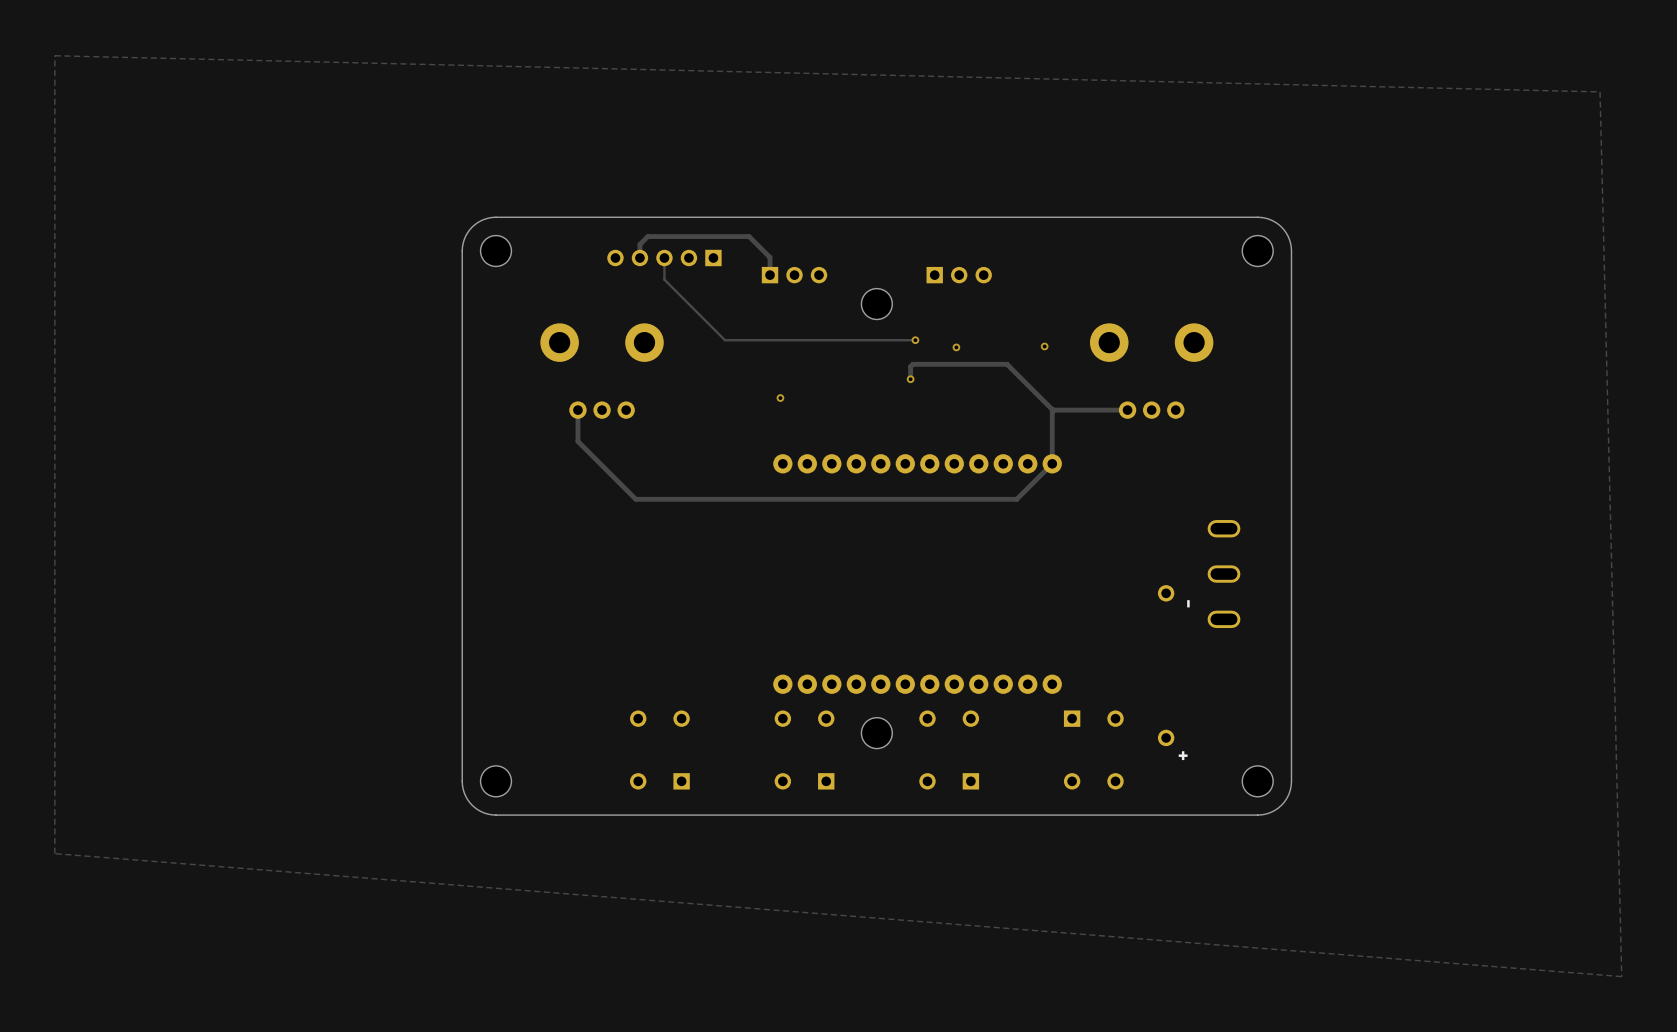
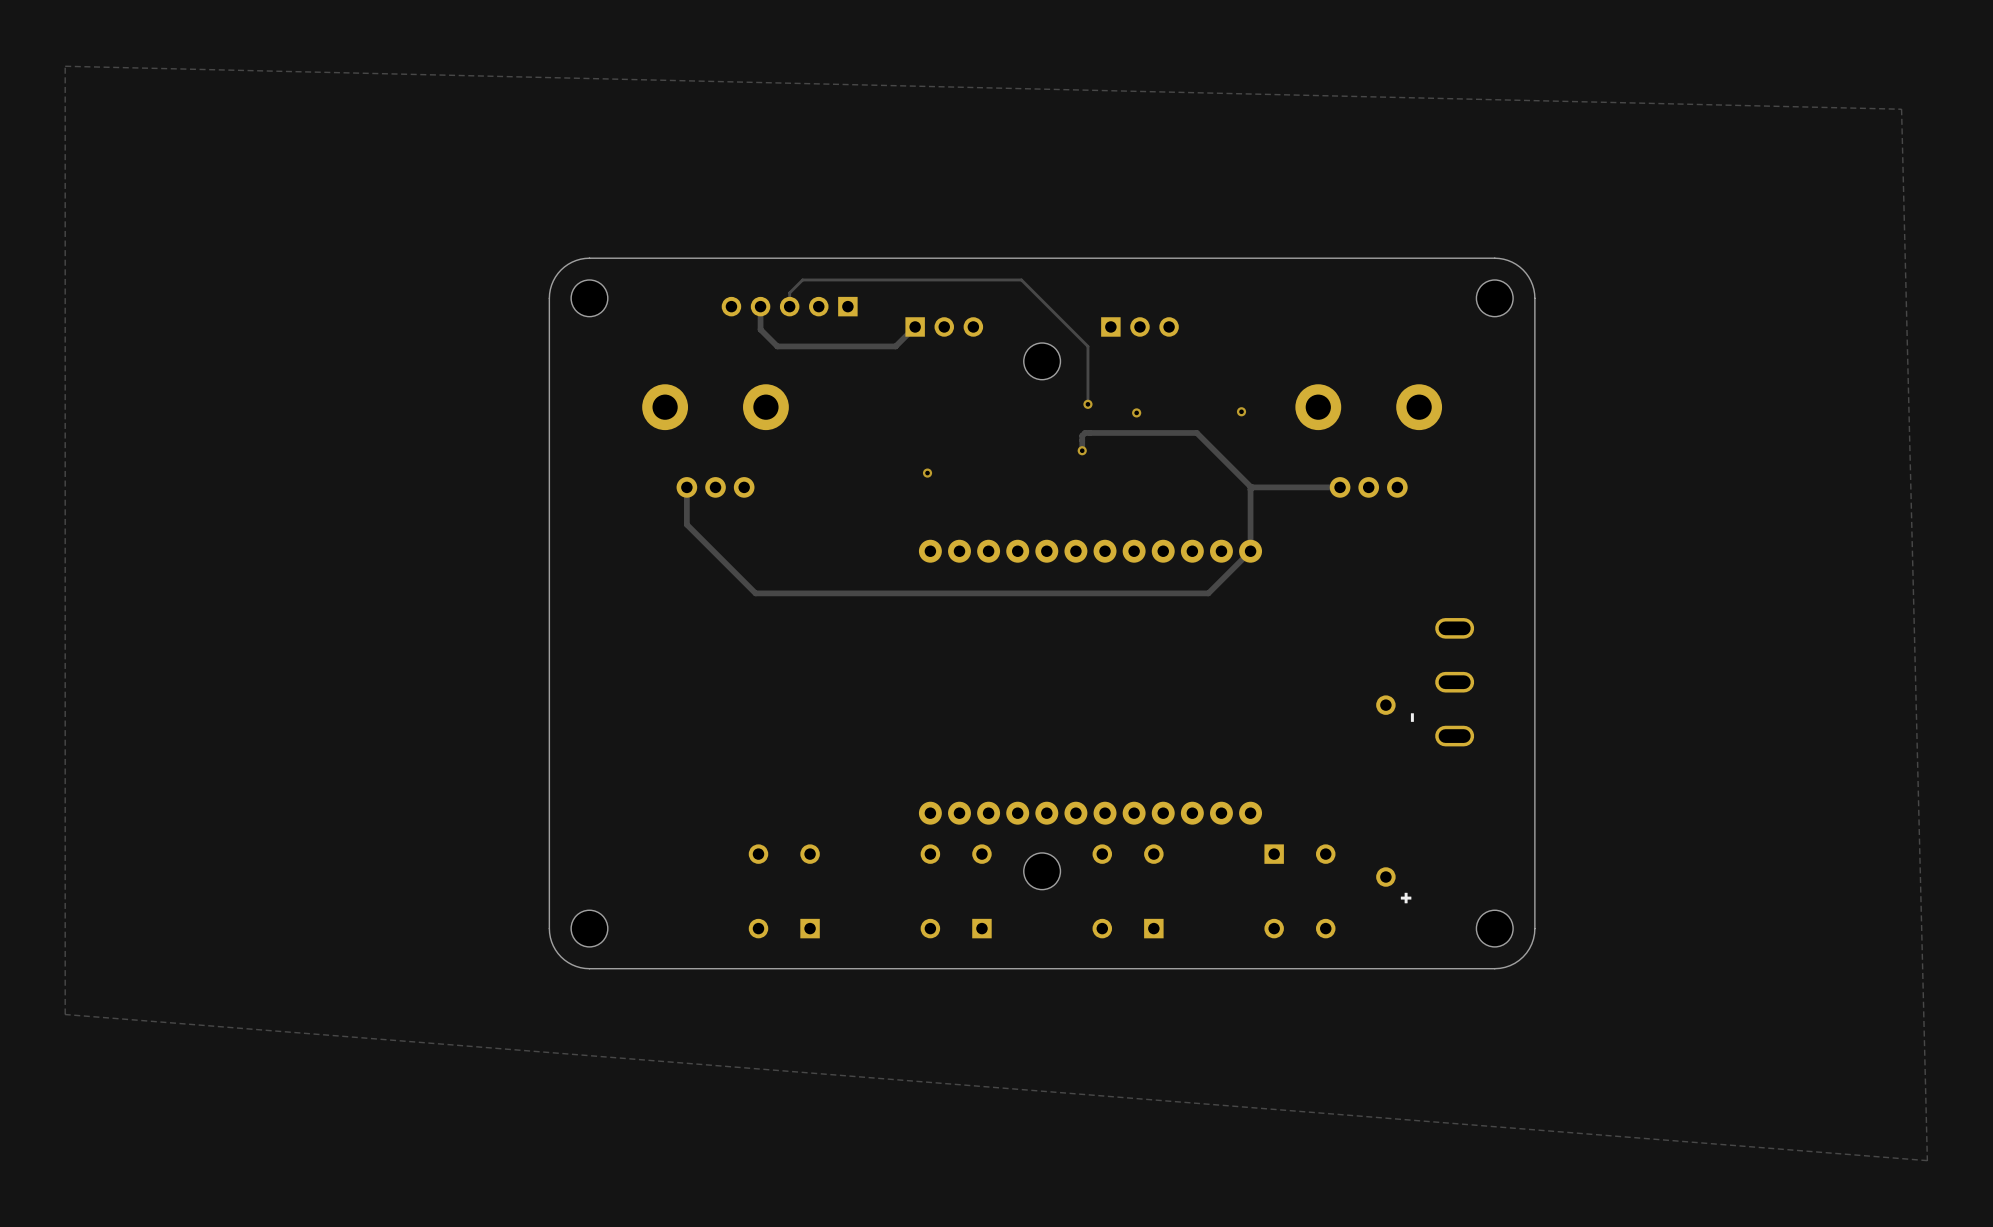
track: (639, 258) (639, 244) (647, 236) (749, 236) (770, 257) (770, 275) -> (760, 306) (760, 329) (777, 346) (895, 346) (915, 326)
track: (664, 258) (664, 279) (725, 340) (915, 340) -> (789, 306) (789, 292) (802, 279) (1021, 279) (1087, 346) (1087, 404)

